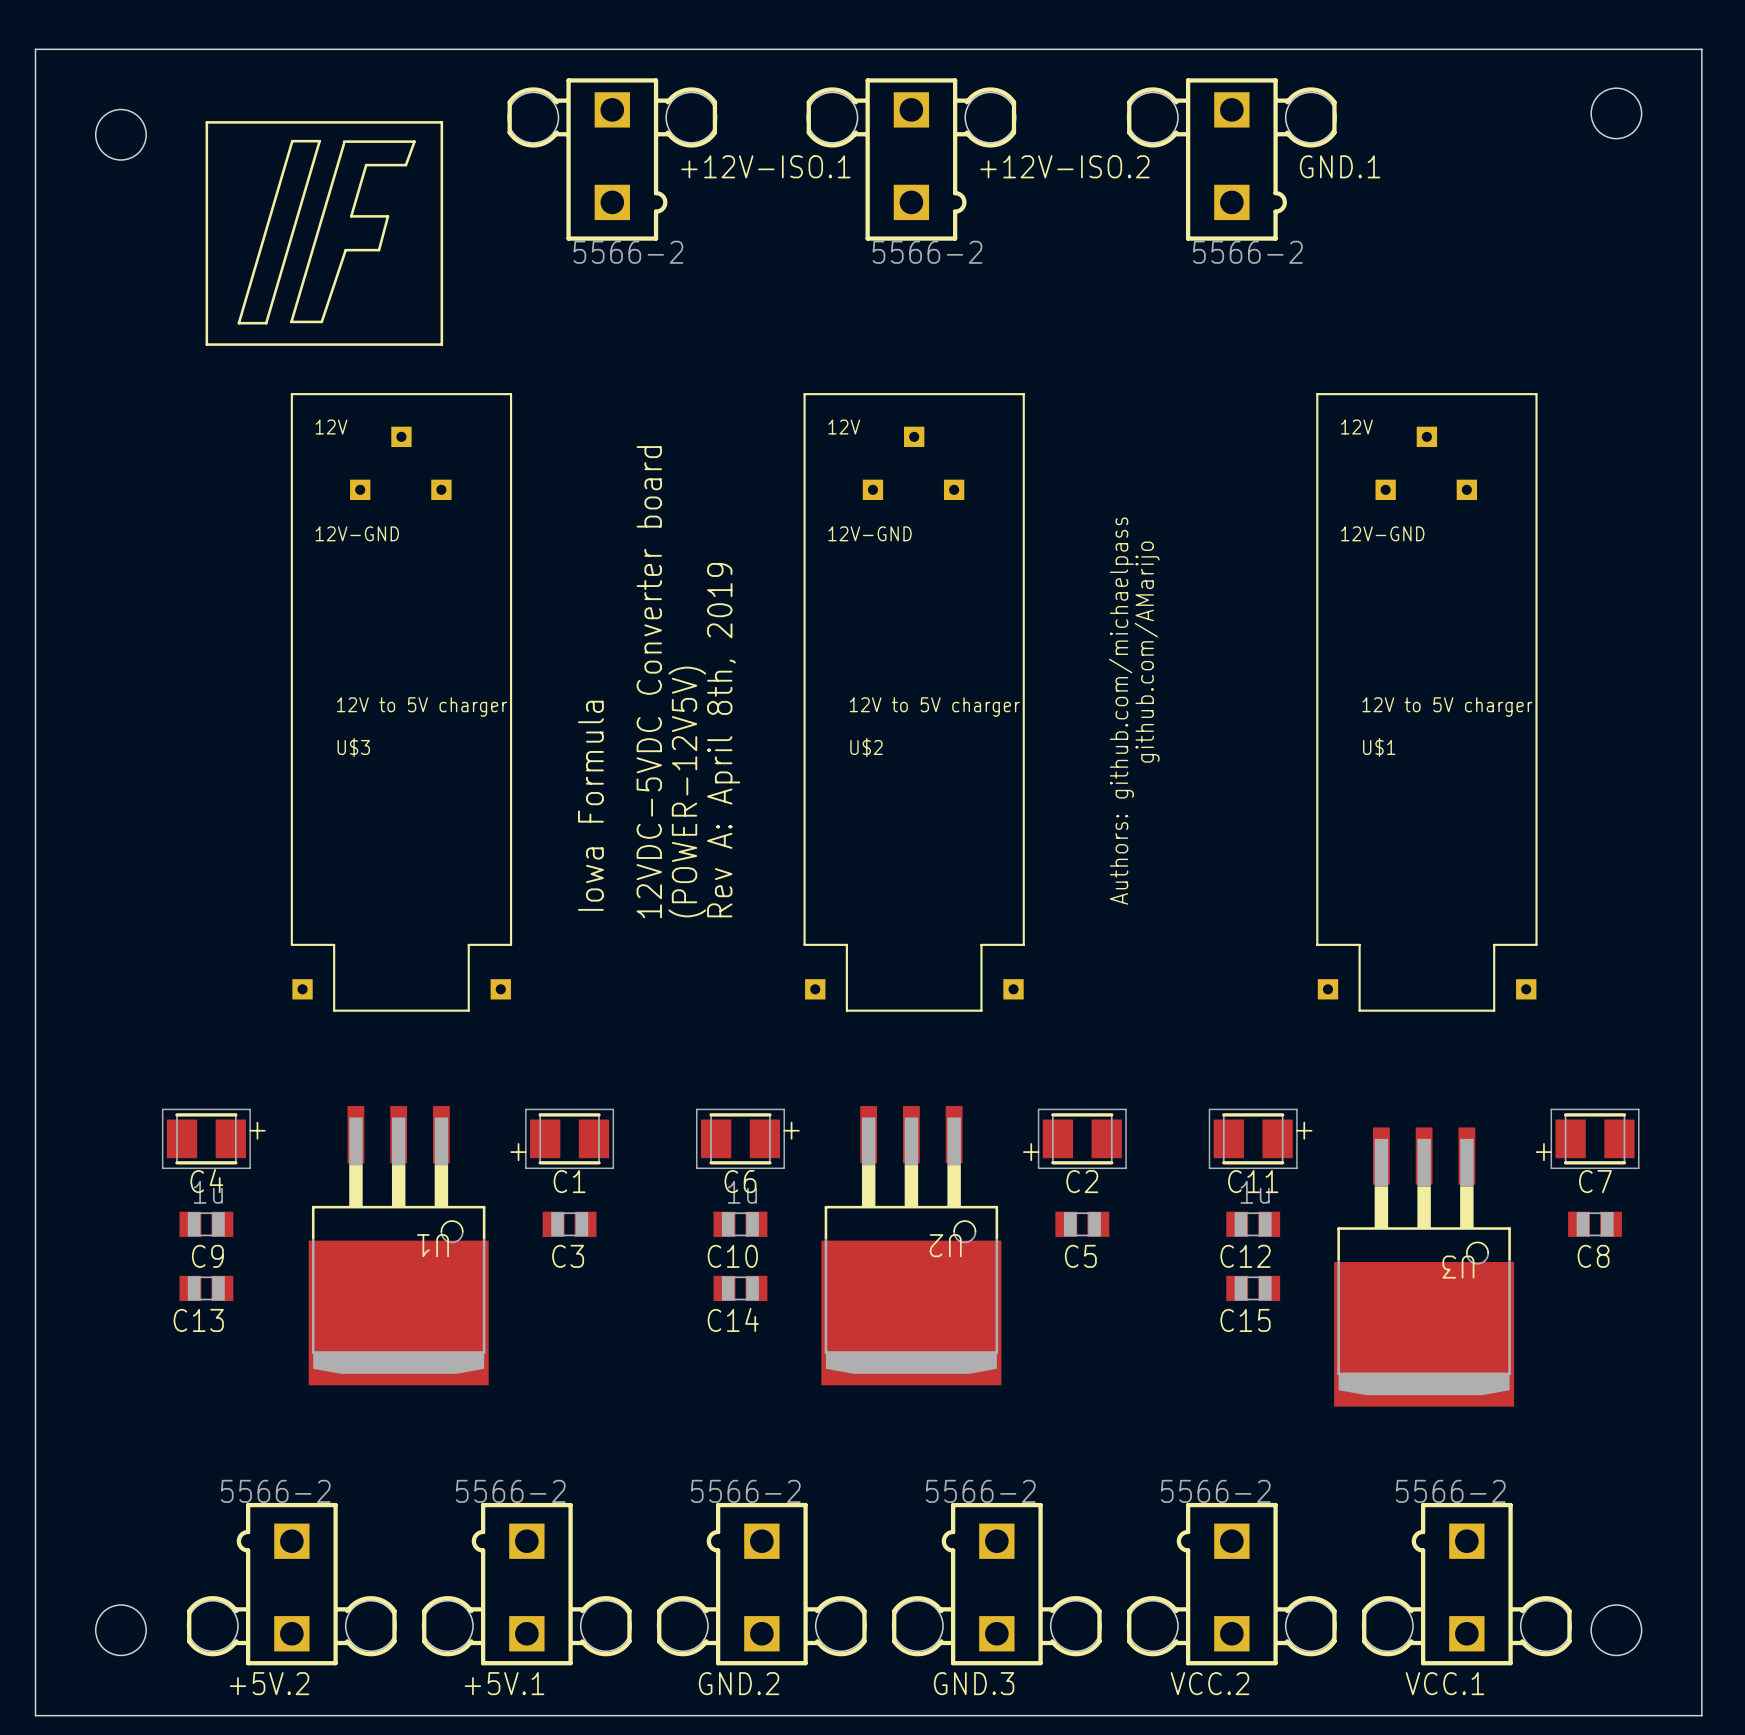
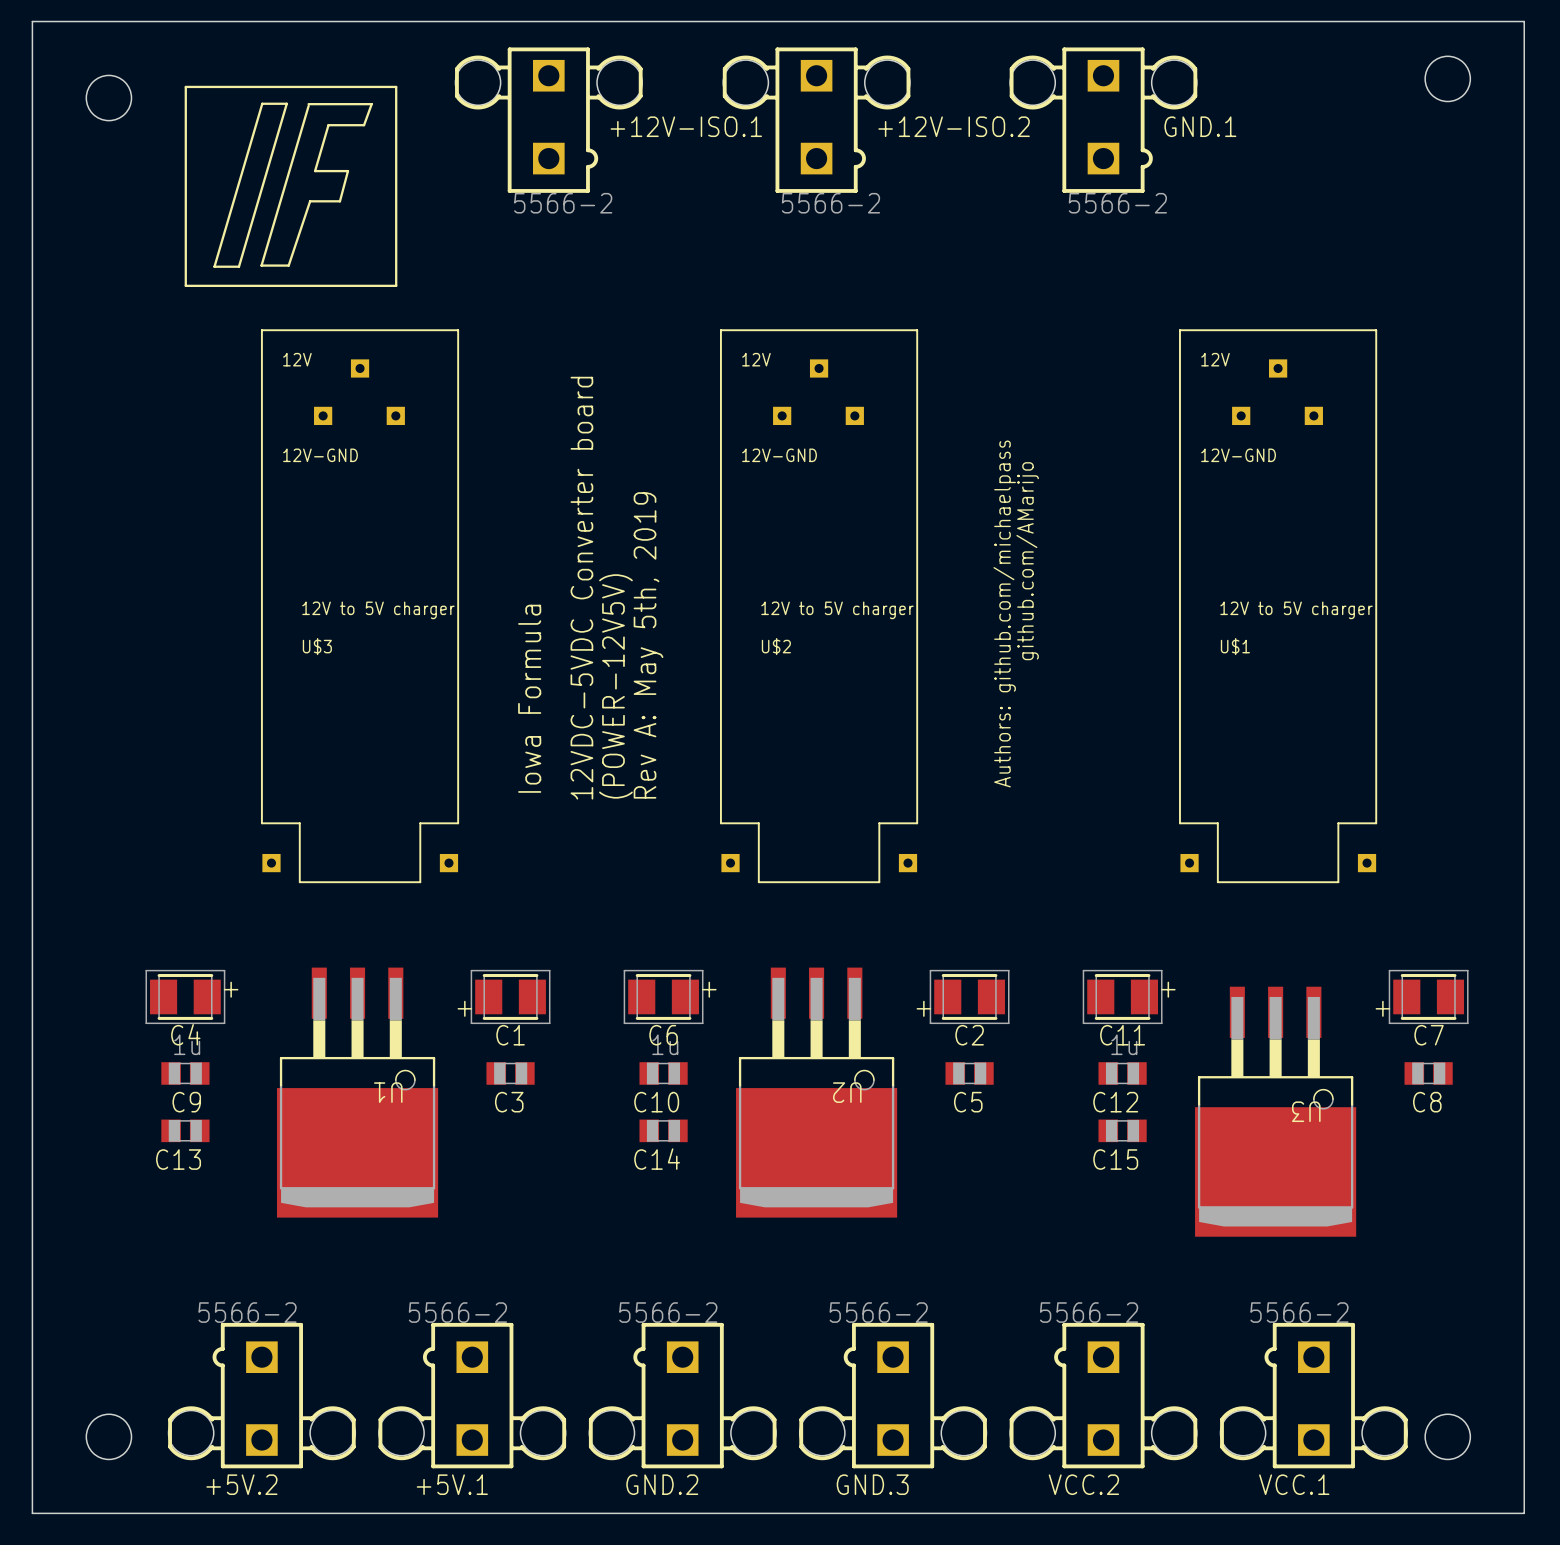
text: Rev A: April 8th, 2019 (723, 740) -> Rev A: May 5th, 2019 (648, 645)

